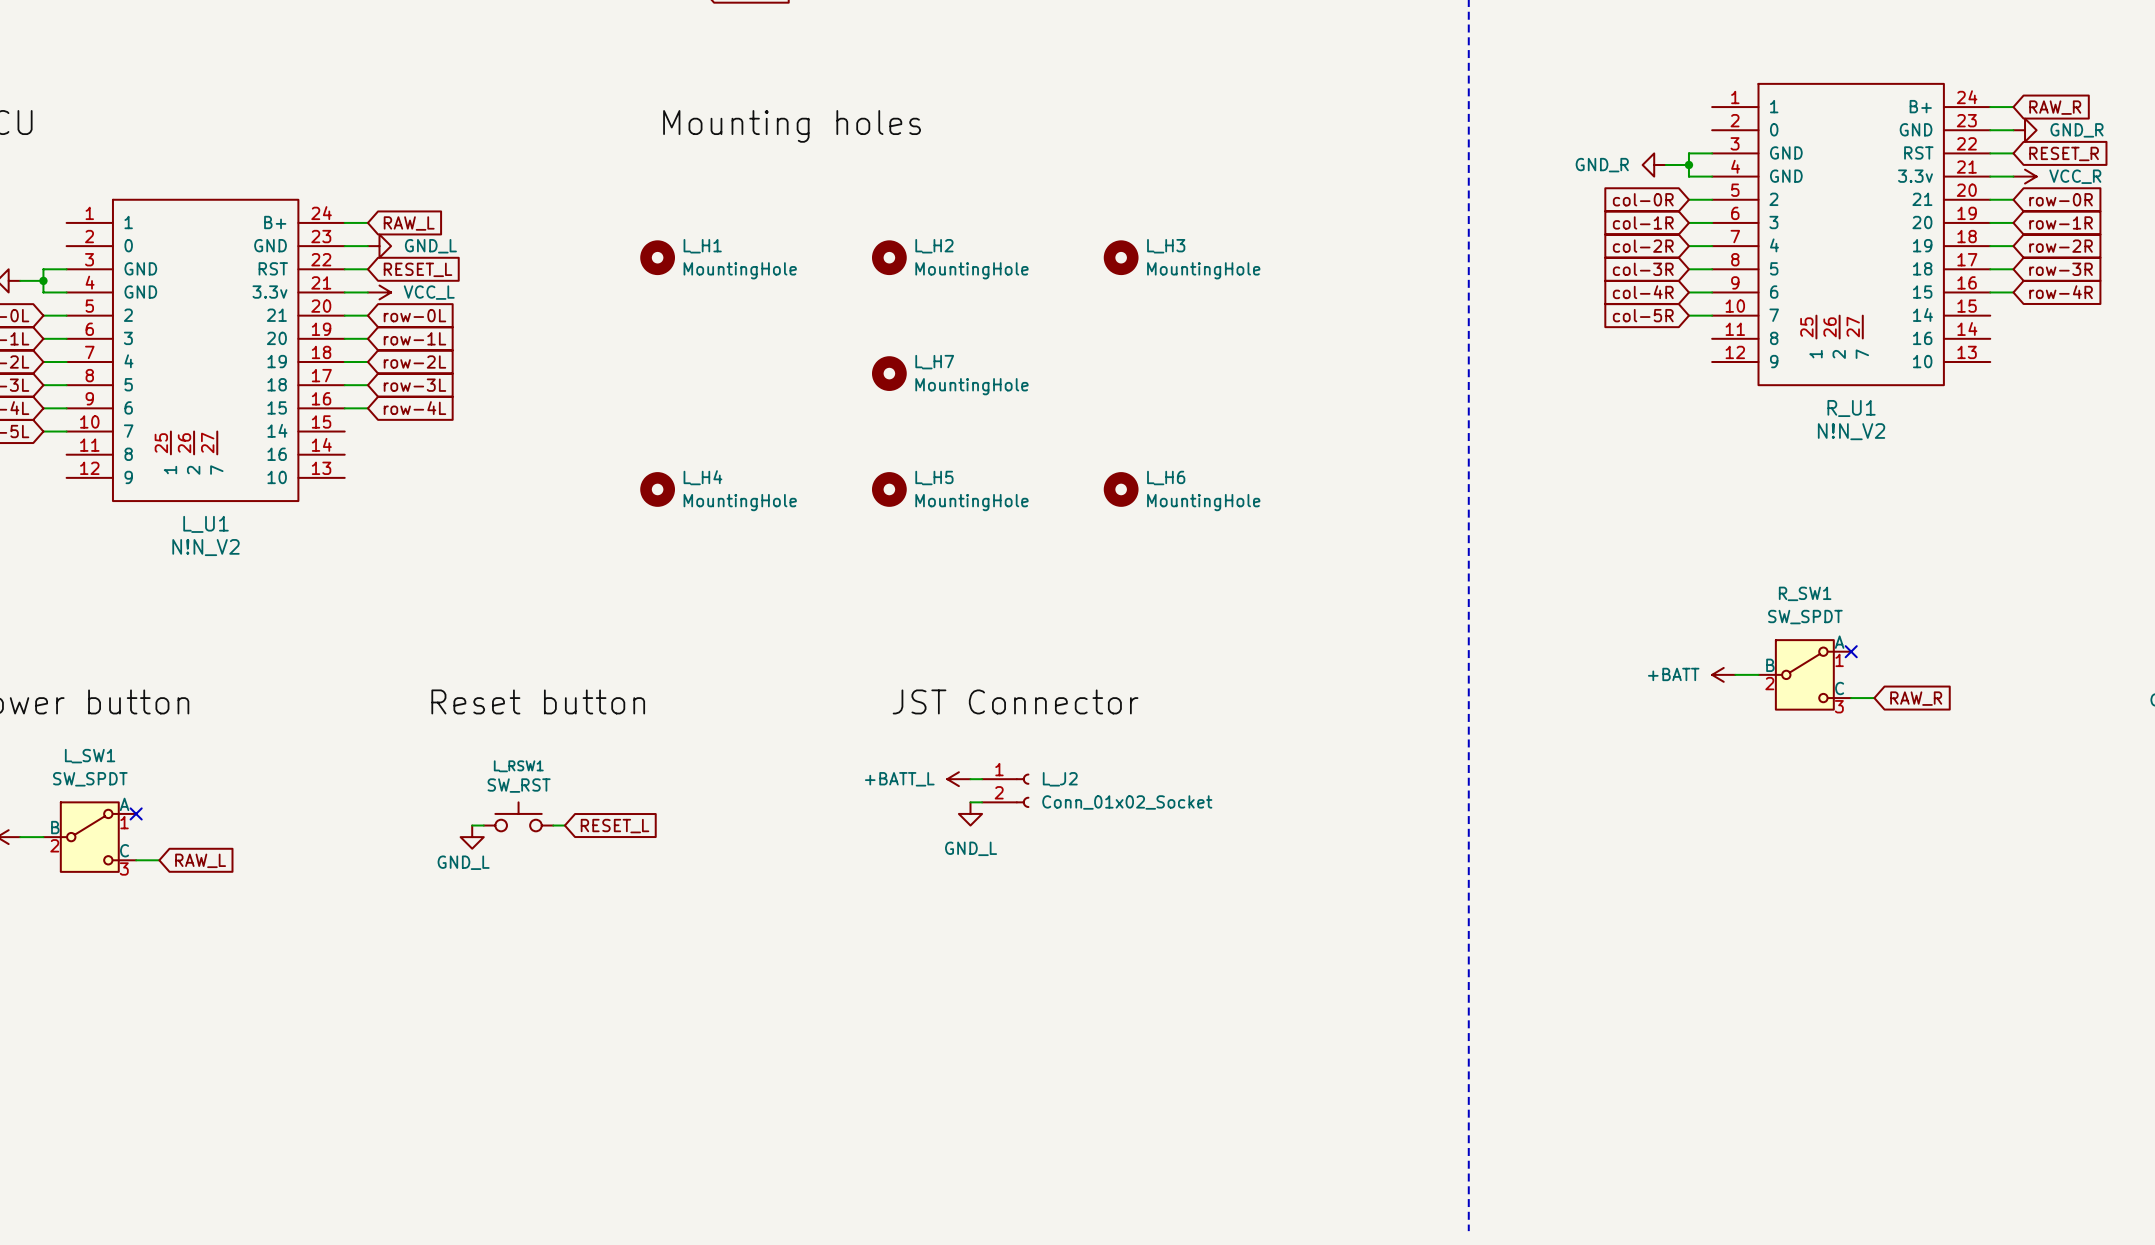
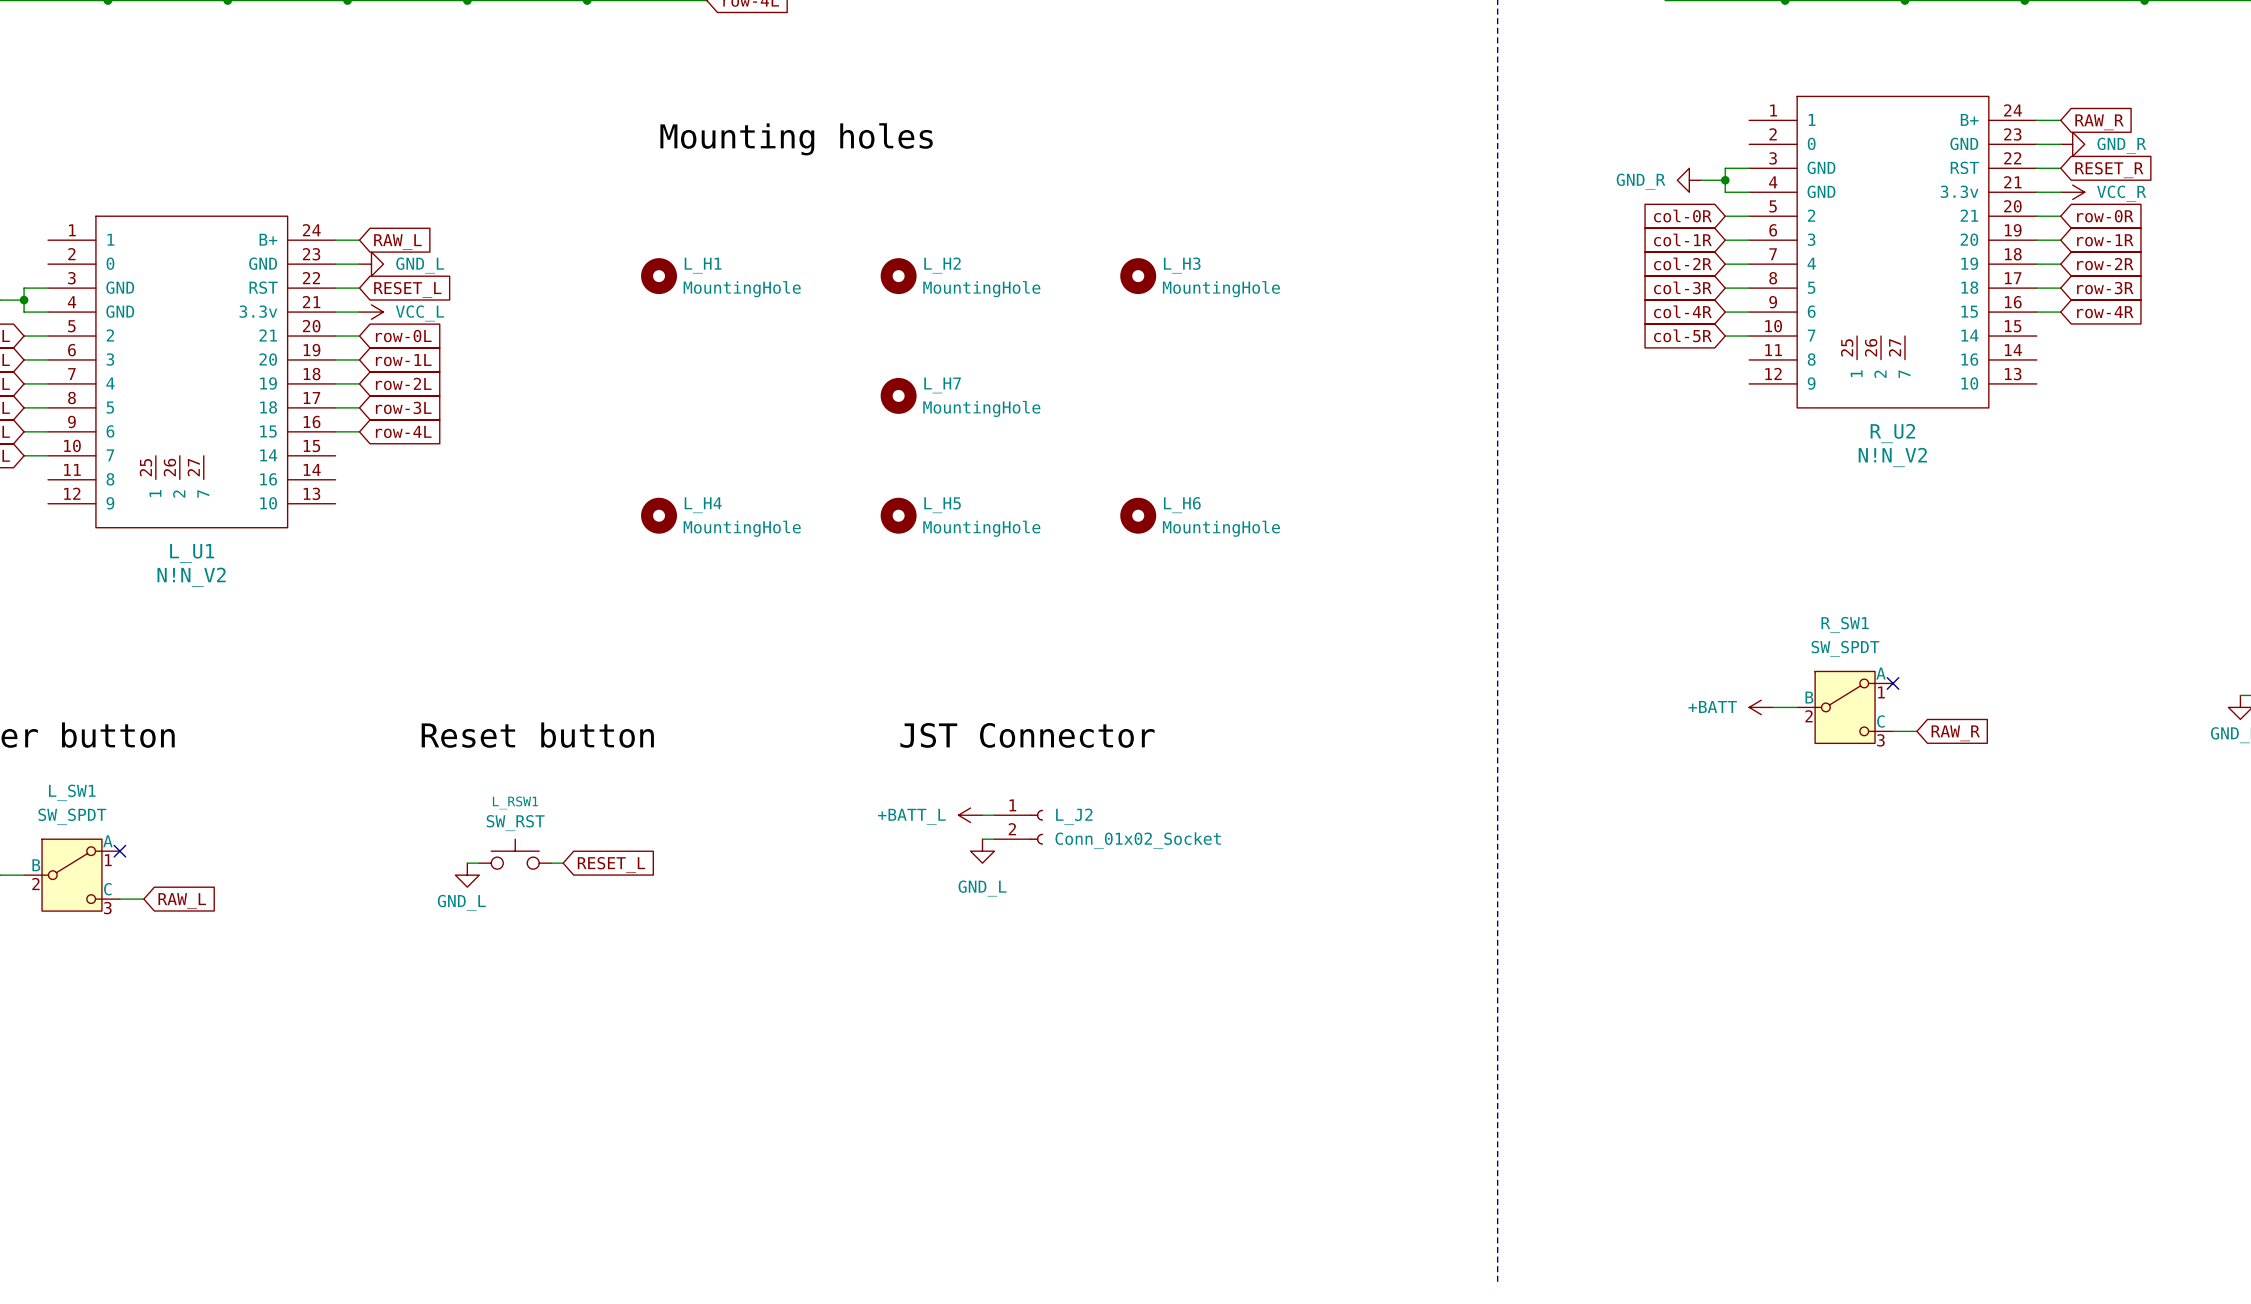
R_U1 name: R_U1 (1851, 408) -> R_U2 (1892, 433)

